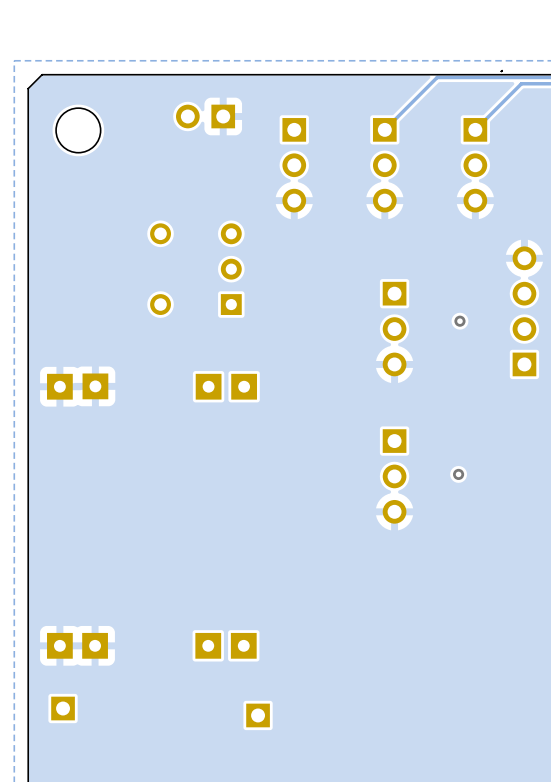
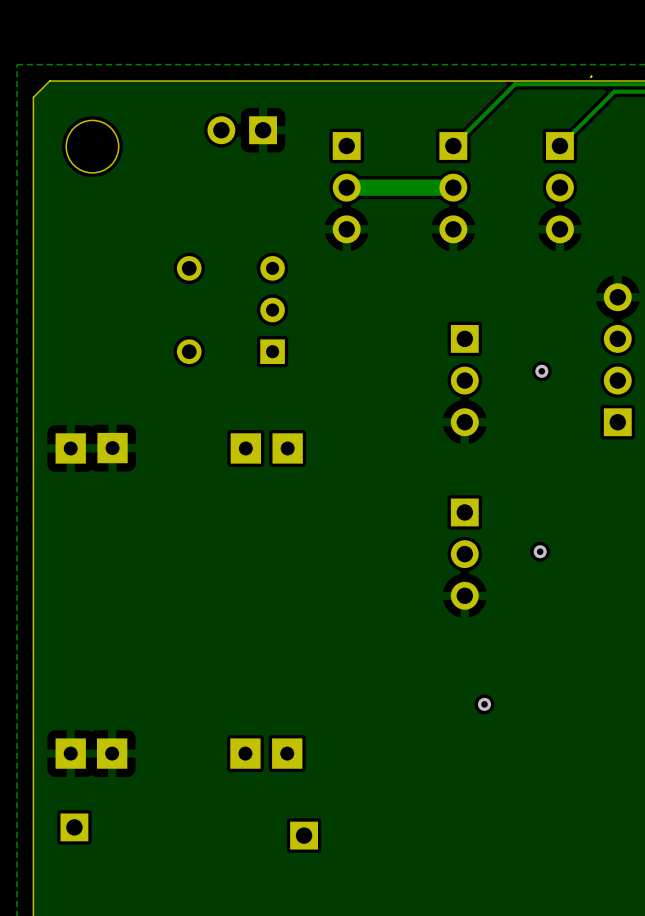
track: none -> (453, 187) (346, 187)
via: none -> (484, 704)

